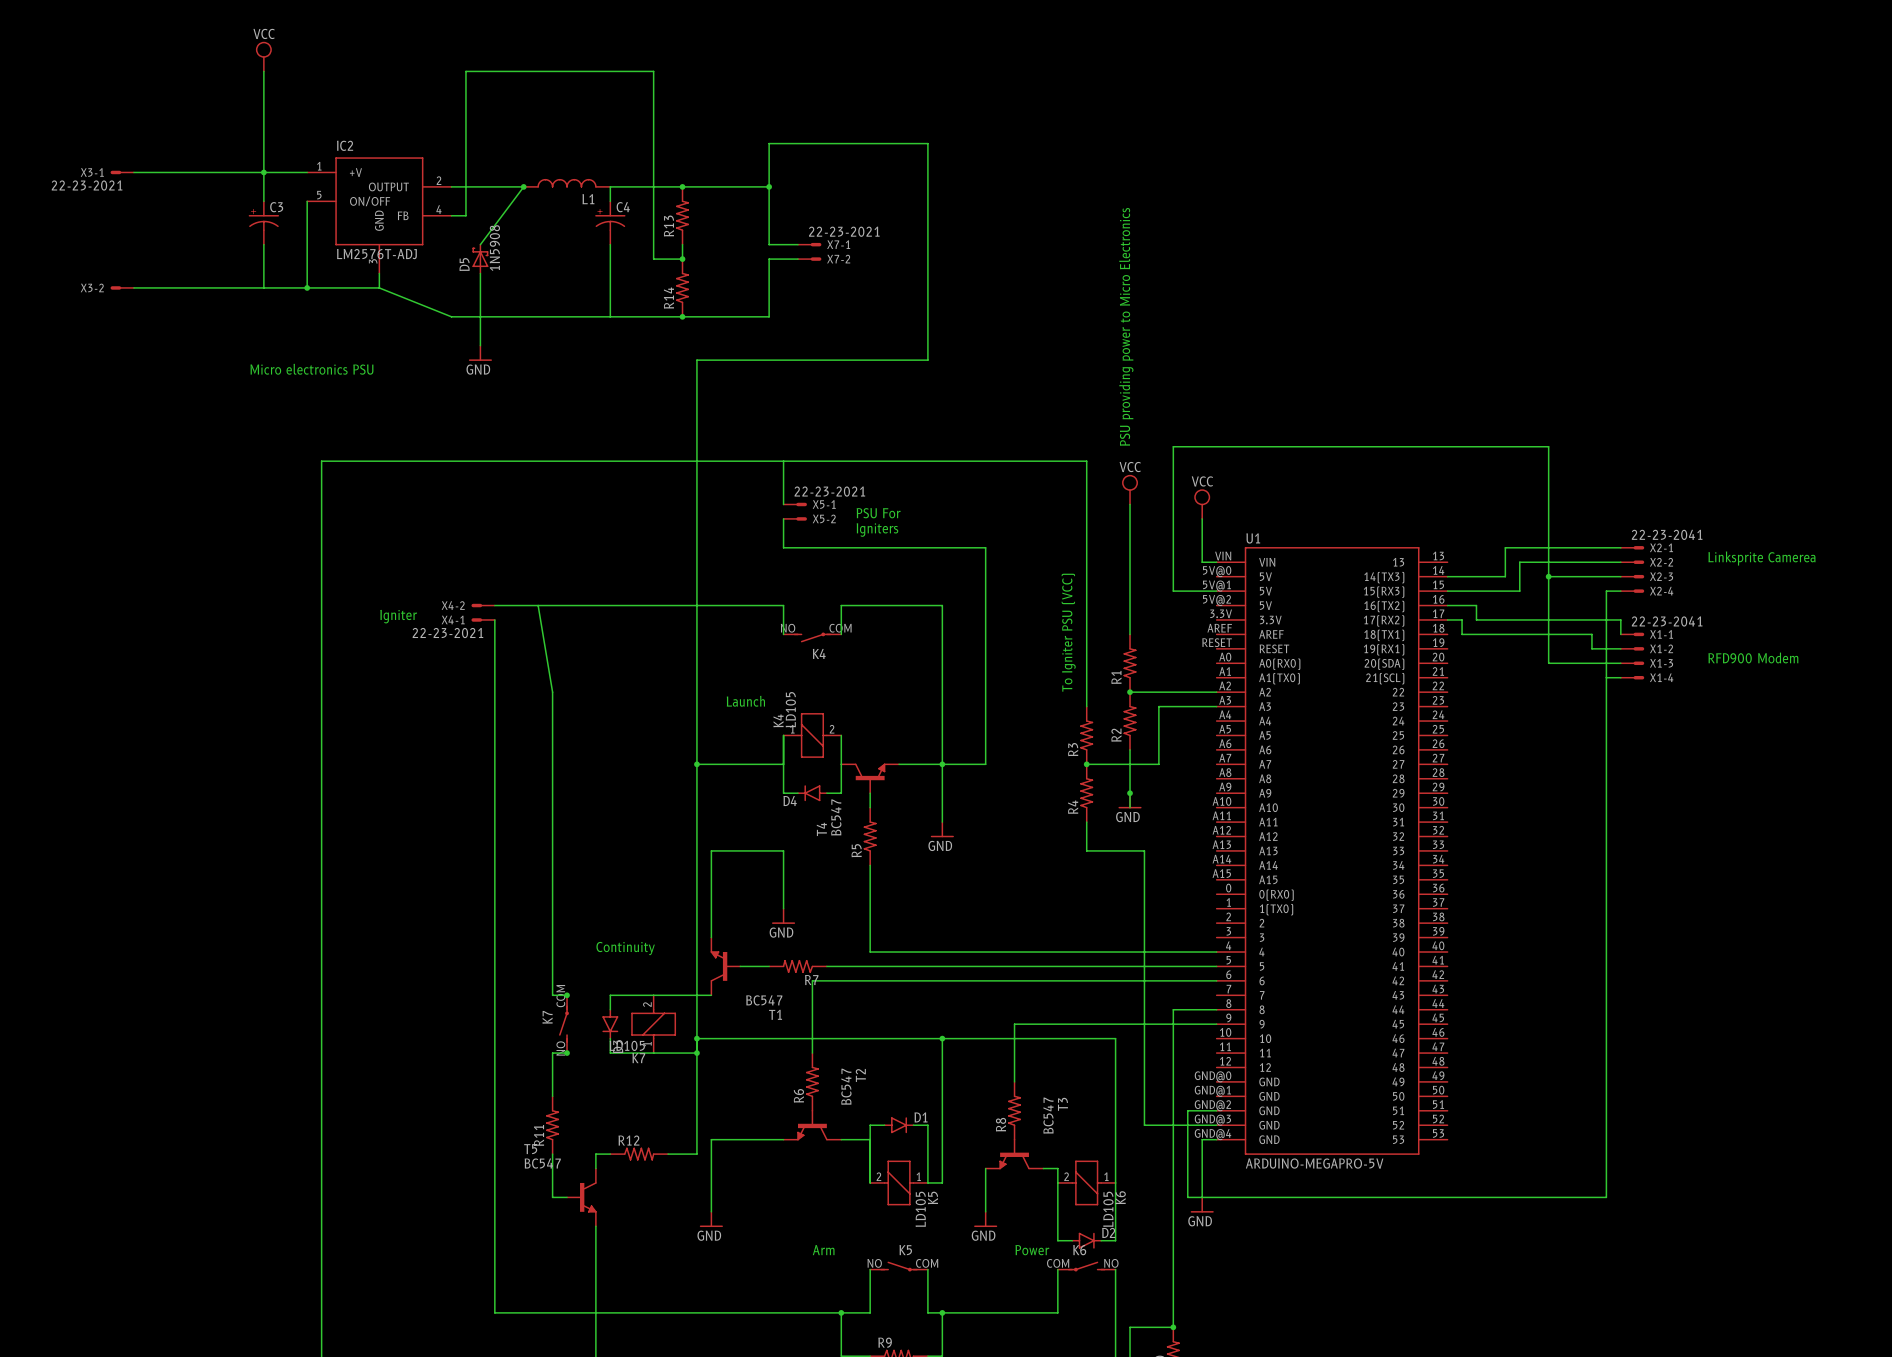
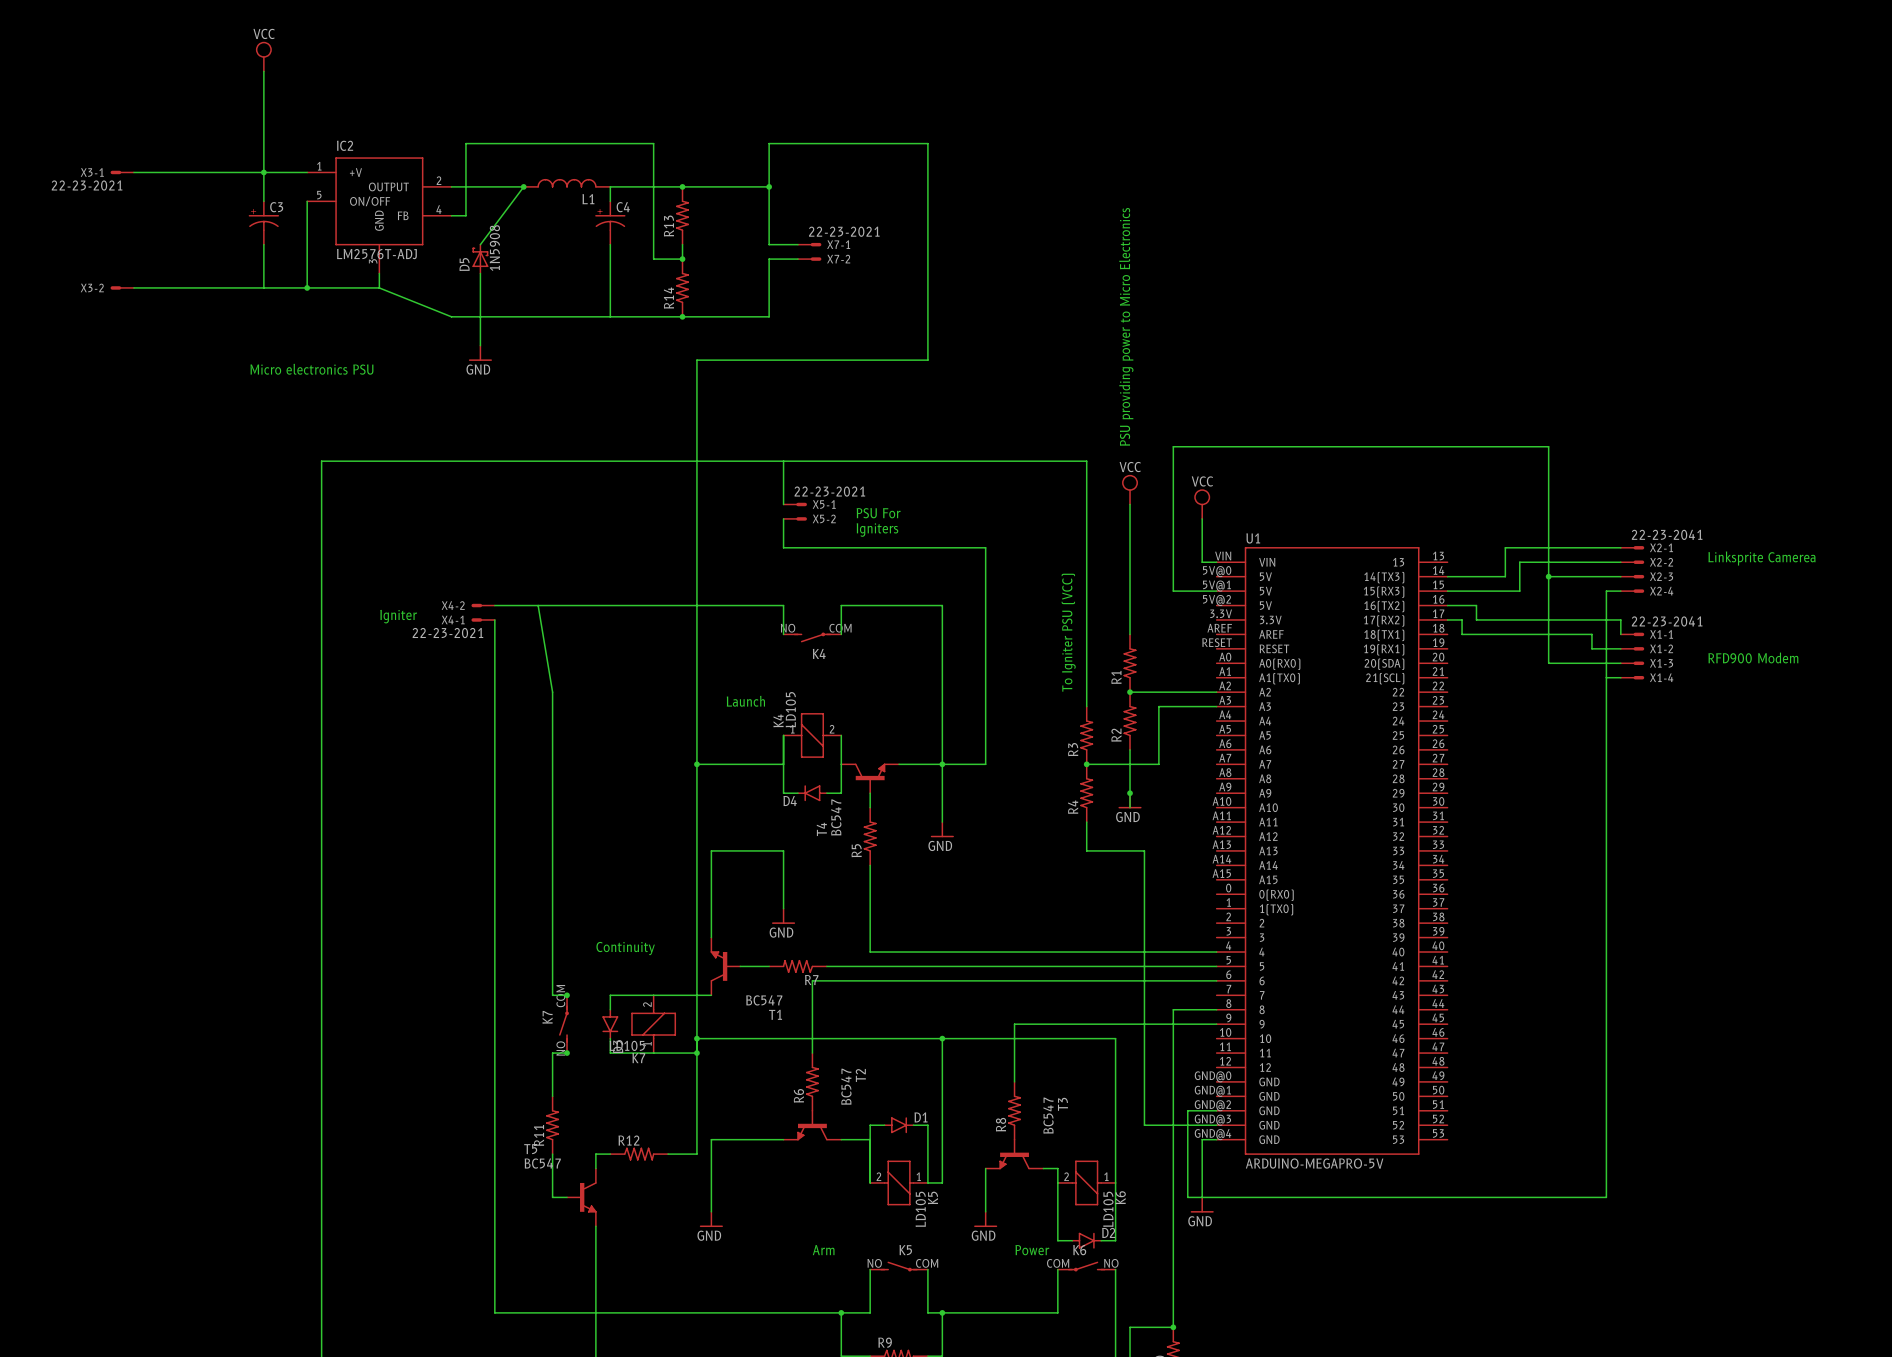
wire: (465, 143) (465, 71) (653, 71) (653, 143) -> (465, 143) (653, 143)

